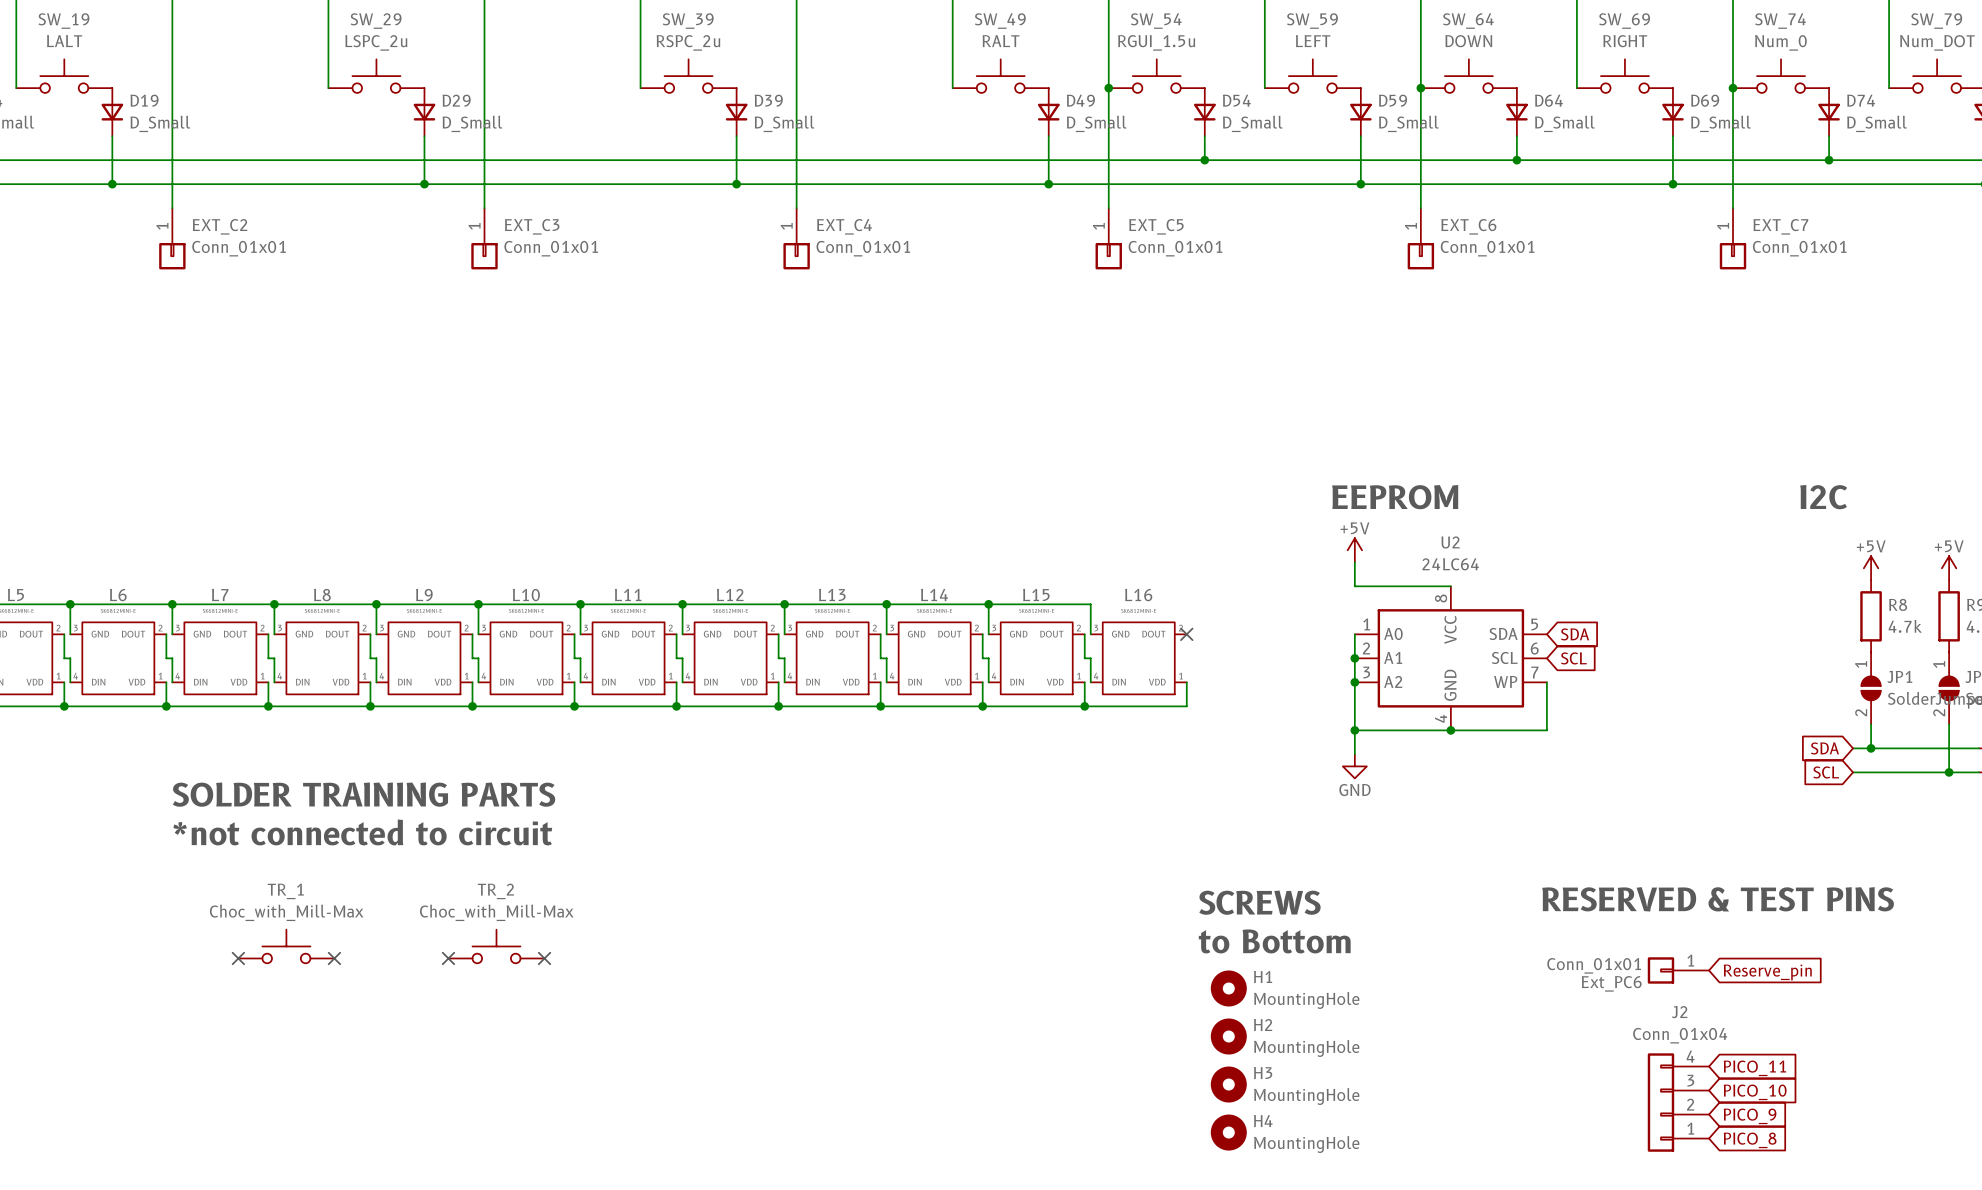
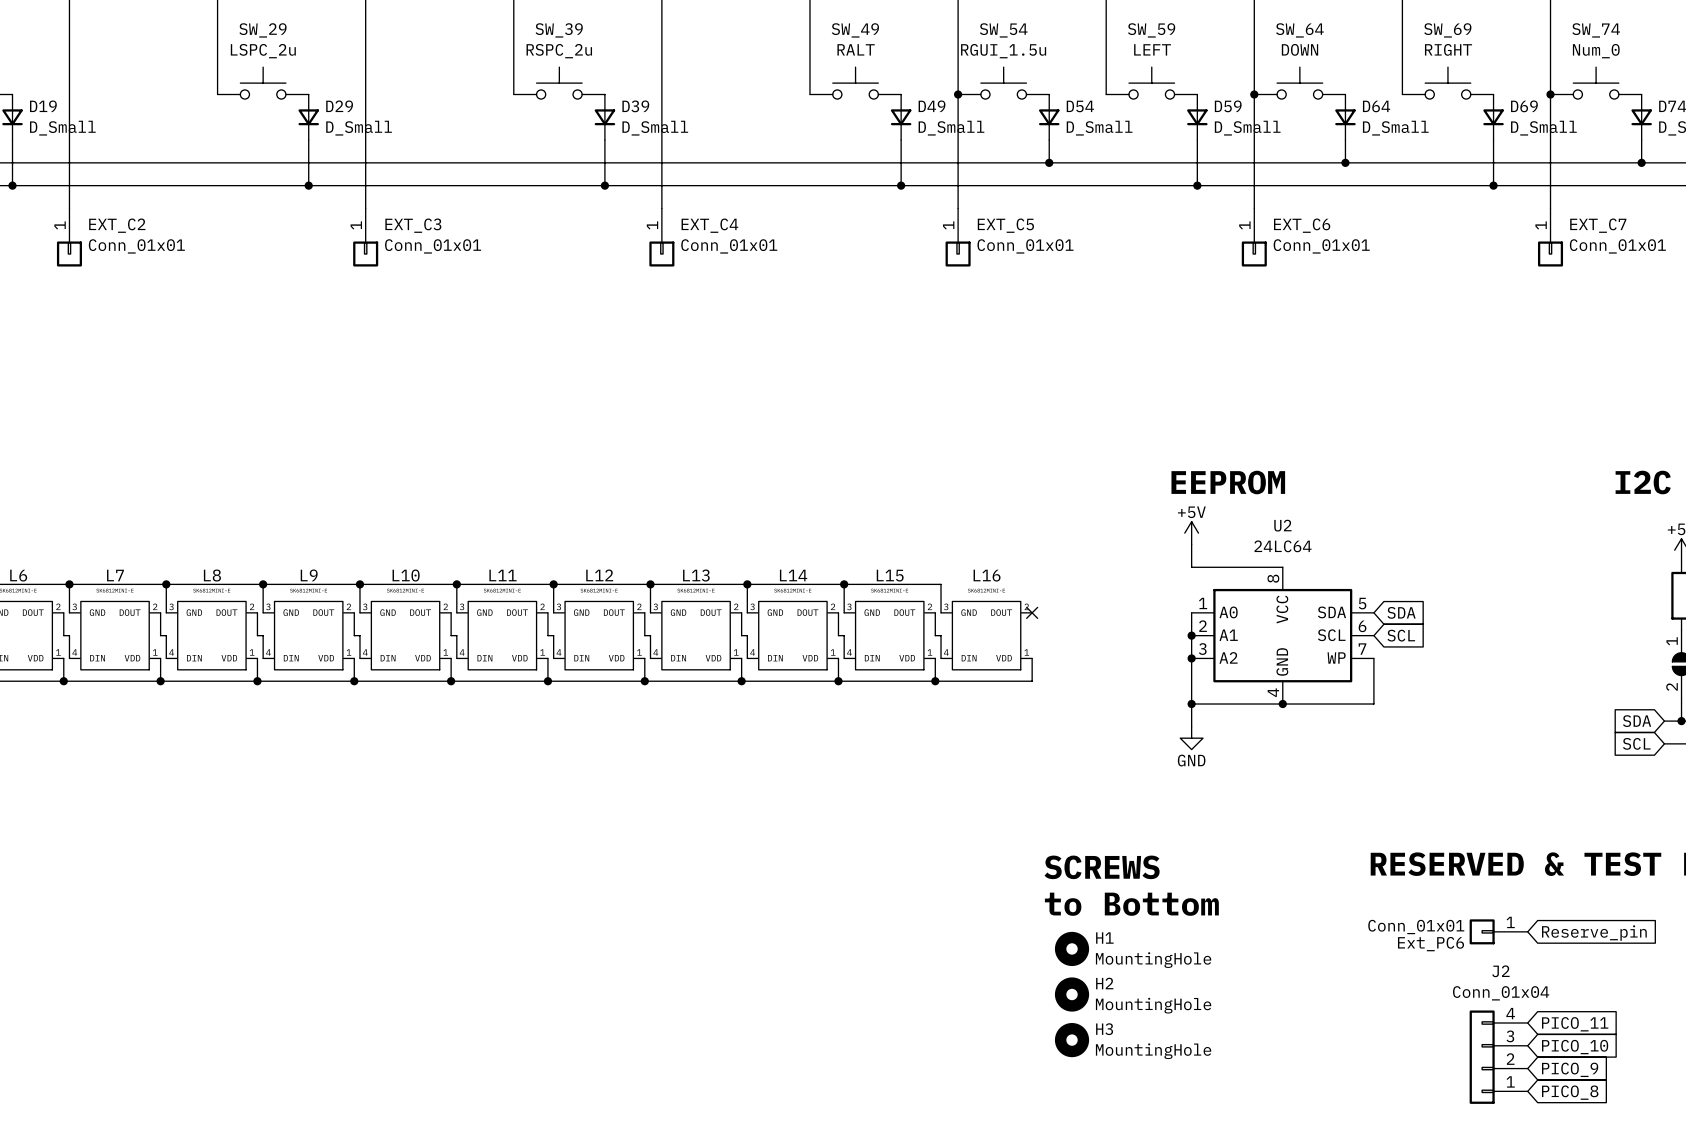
text: SOLDER TRAINING PARTS (364, 794) -> none
text: *not connected to circuit (362, 832) -> none
TR_1: Choc_with_Mill-Max (286, 946) -> none
TR_2: Choc_with_Mill-Max (496, 946) -> none
no-connect mark: (238, 958) -> none
no-connect mark: (334, 958) -> none
no-connect mark: (448, 958) -> none
no-connect mark: (544, 958) -> none
H4: MountingHole (1228, 1132) -> none

